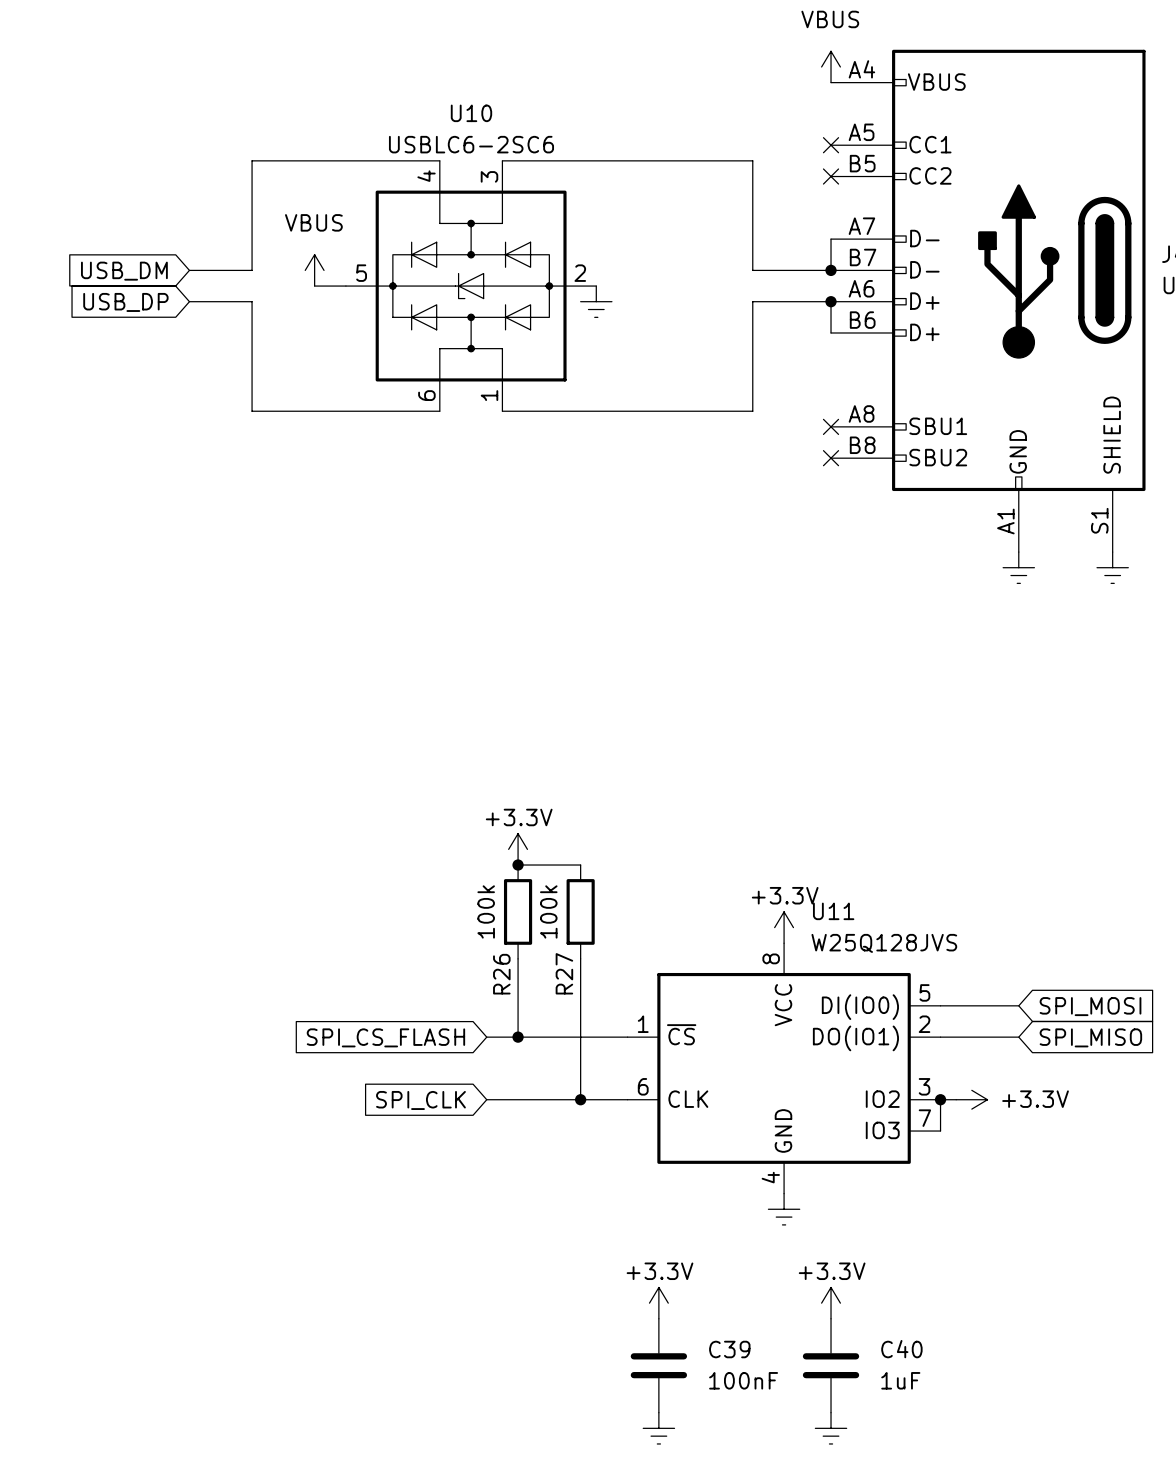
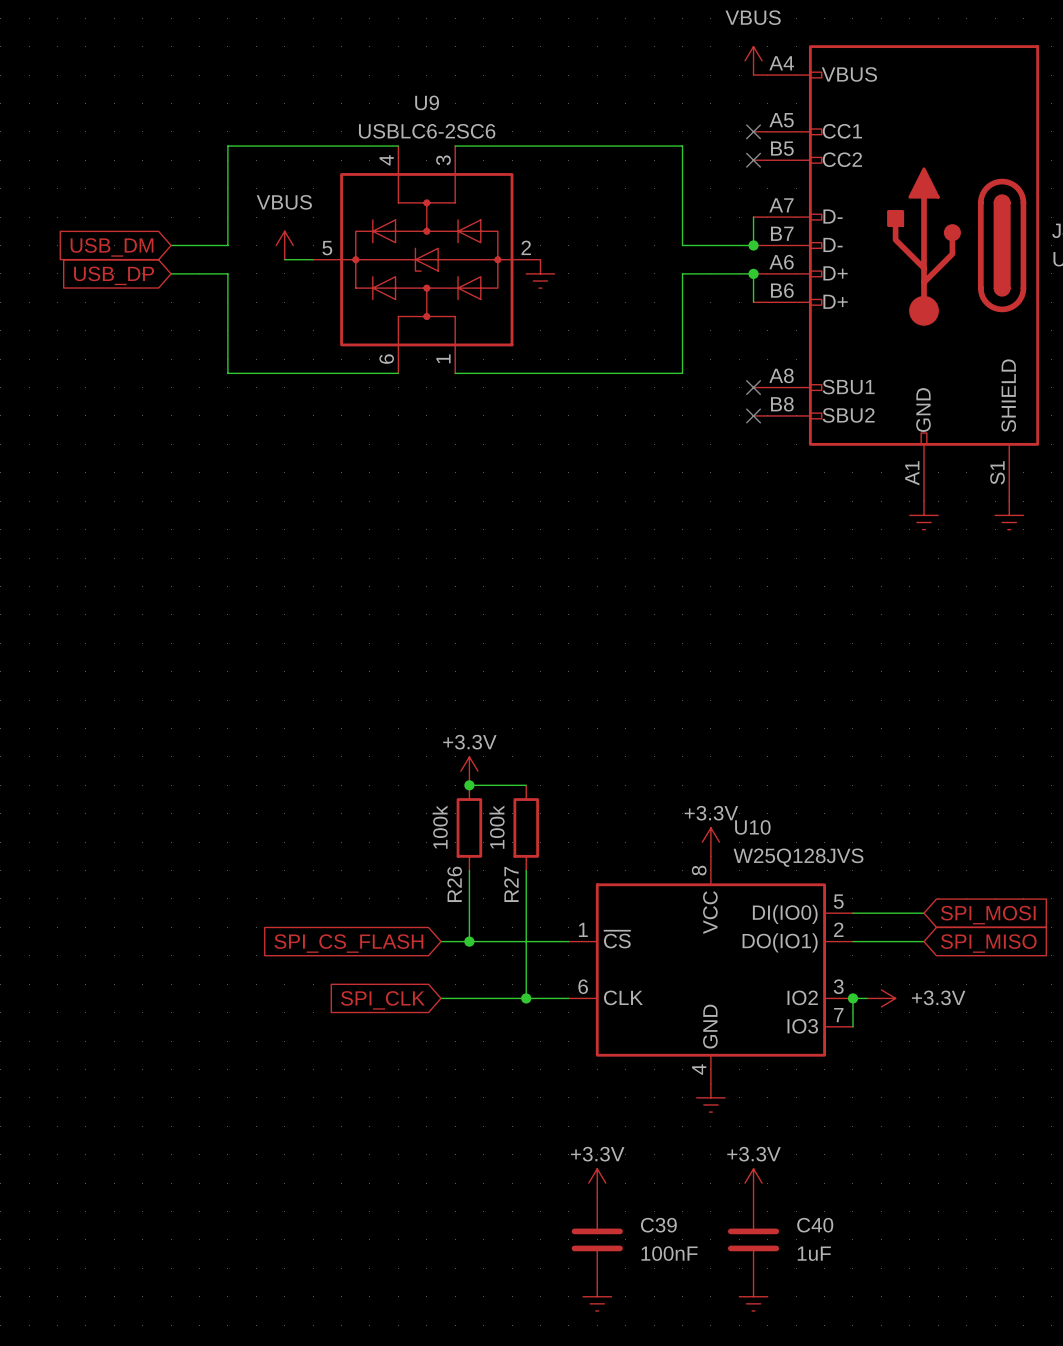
U10 name: U10 (471, 113) -> U9 (427, 102)
U11 name: U11 (833, 911) -> U10 (752, 827)

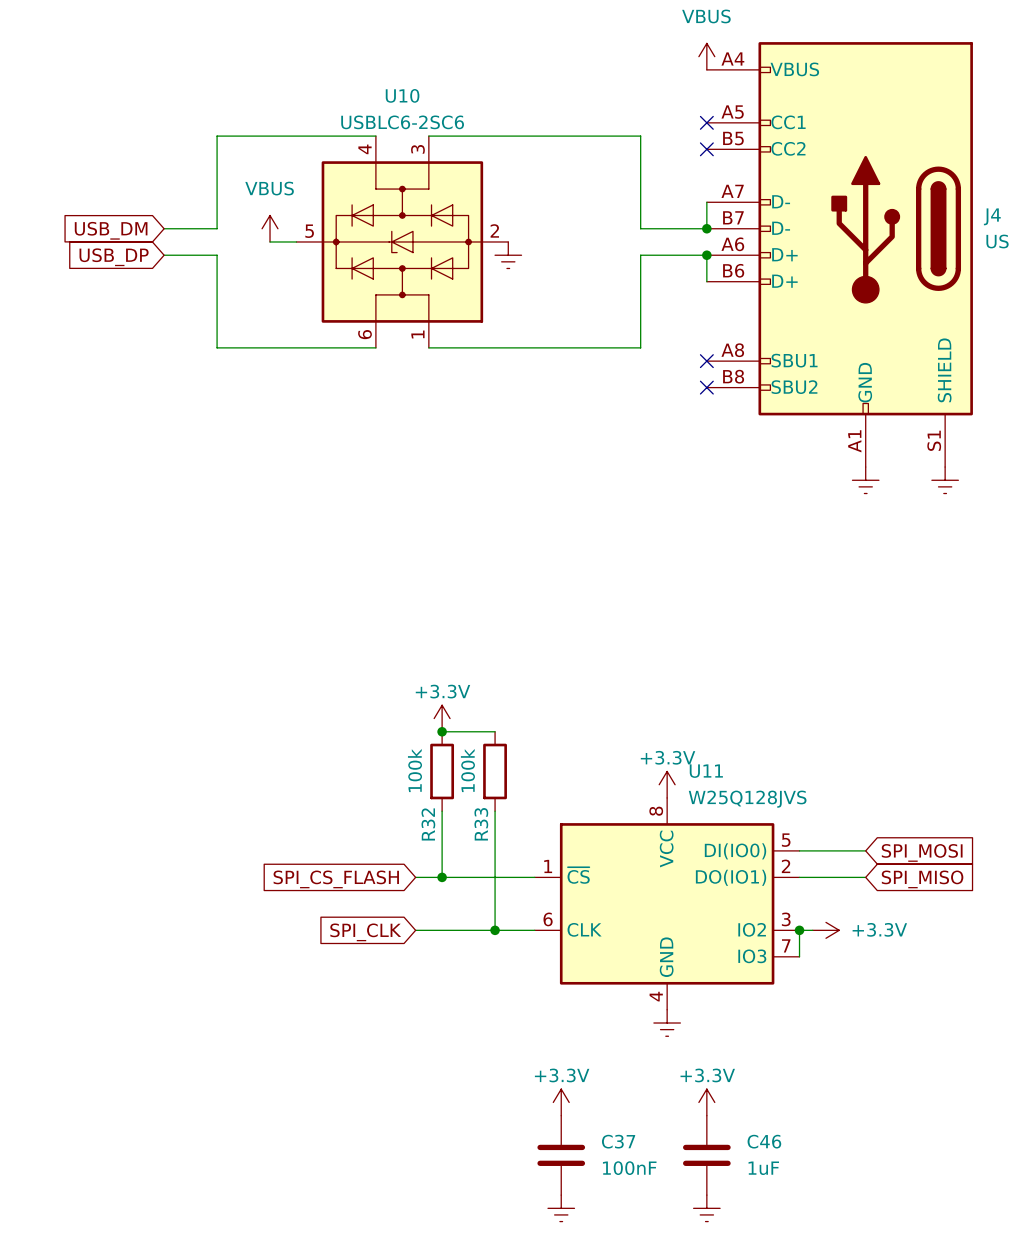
U9 name: U9 (427, 102) -> U10 (402, 95)
U10 name: U10 (752, 827) -> U11 (706, 771)
R26 name: R26 (454, 884) -> R32 (428, 824)
R27 name: R27 (511, 884) -> R33 (481, 824)
C39 name: C39 (658, 1225) -> C37 (618, 1141)
C40 name: C40 (815, 1225) -> C46 (764, 1141)

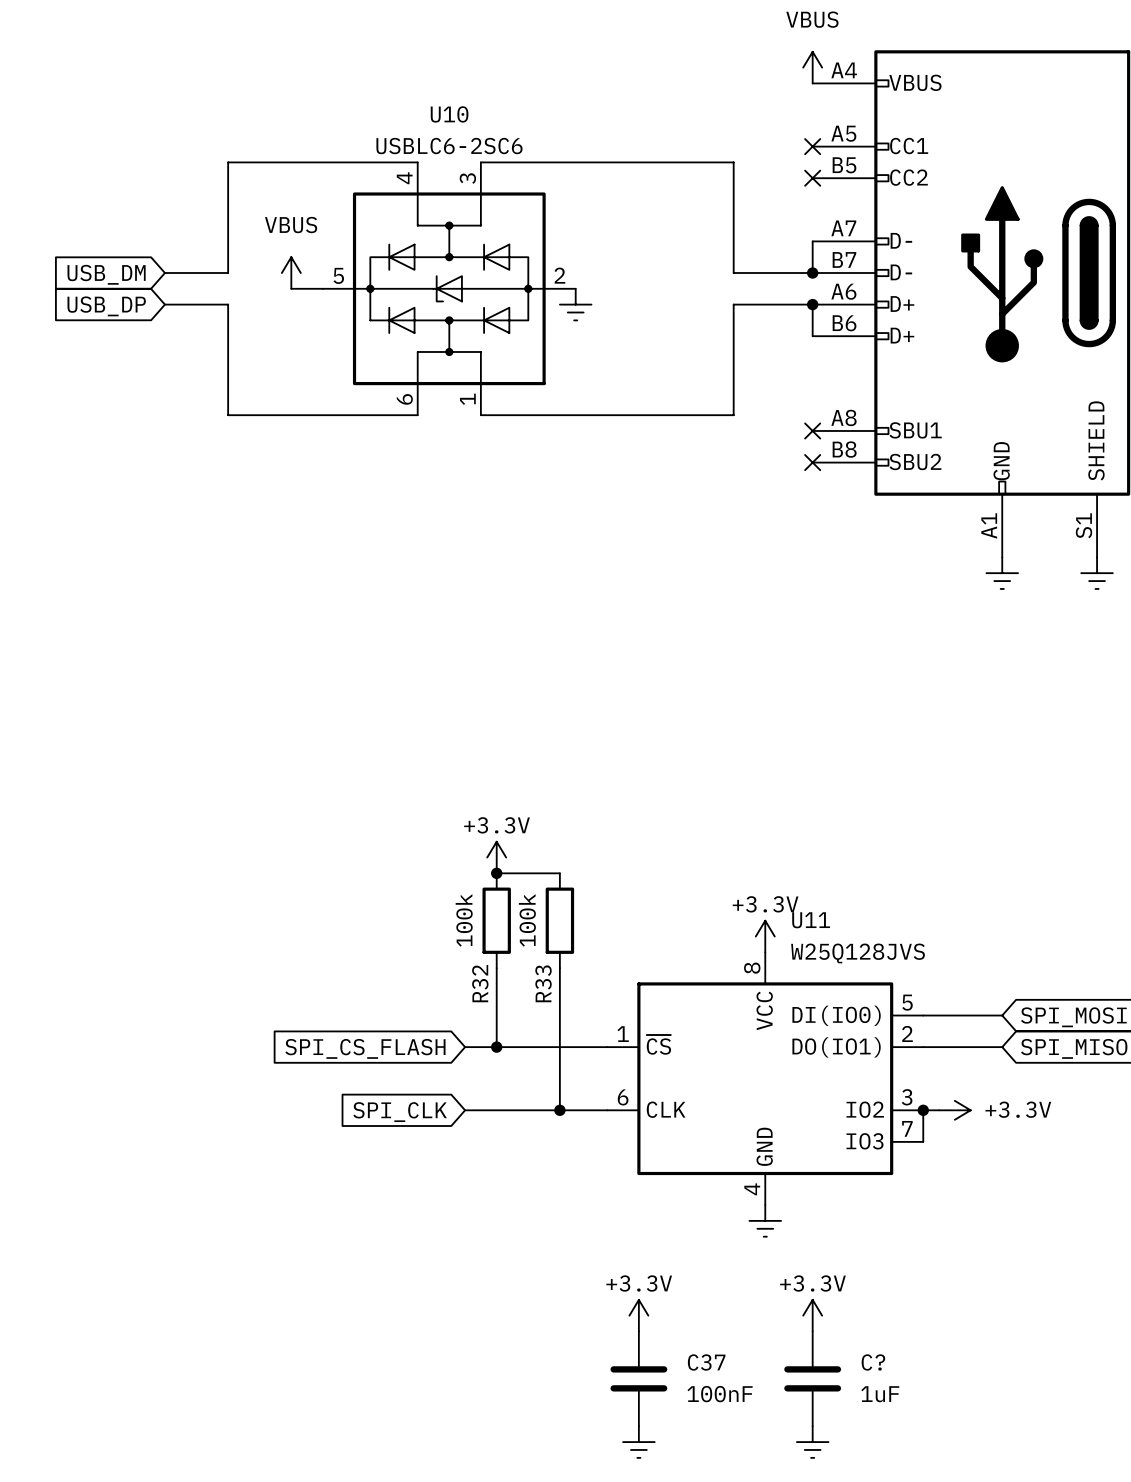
C46 name: C46 (764, 1141) -> C? (873, 1362)

